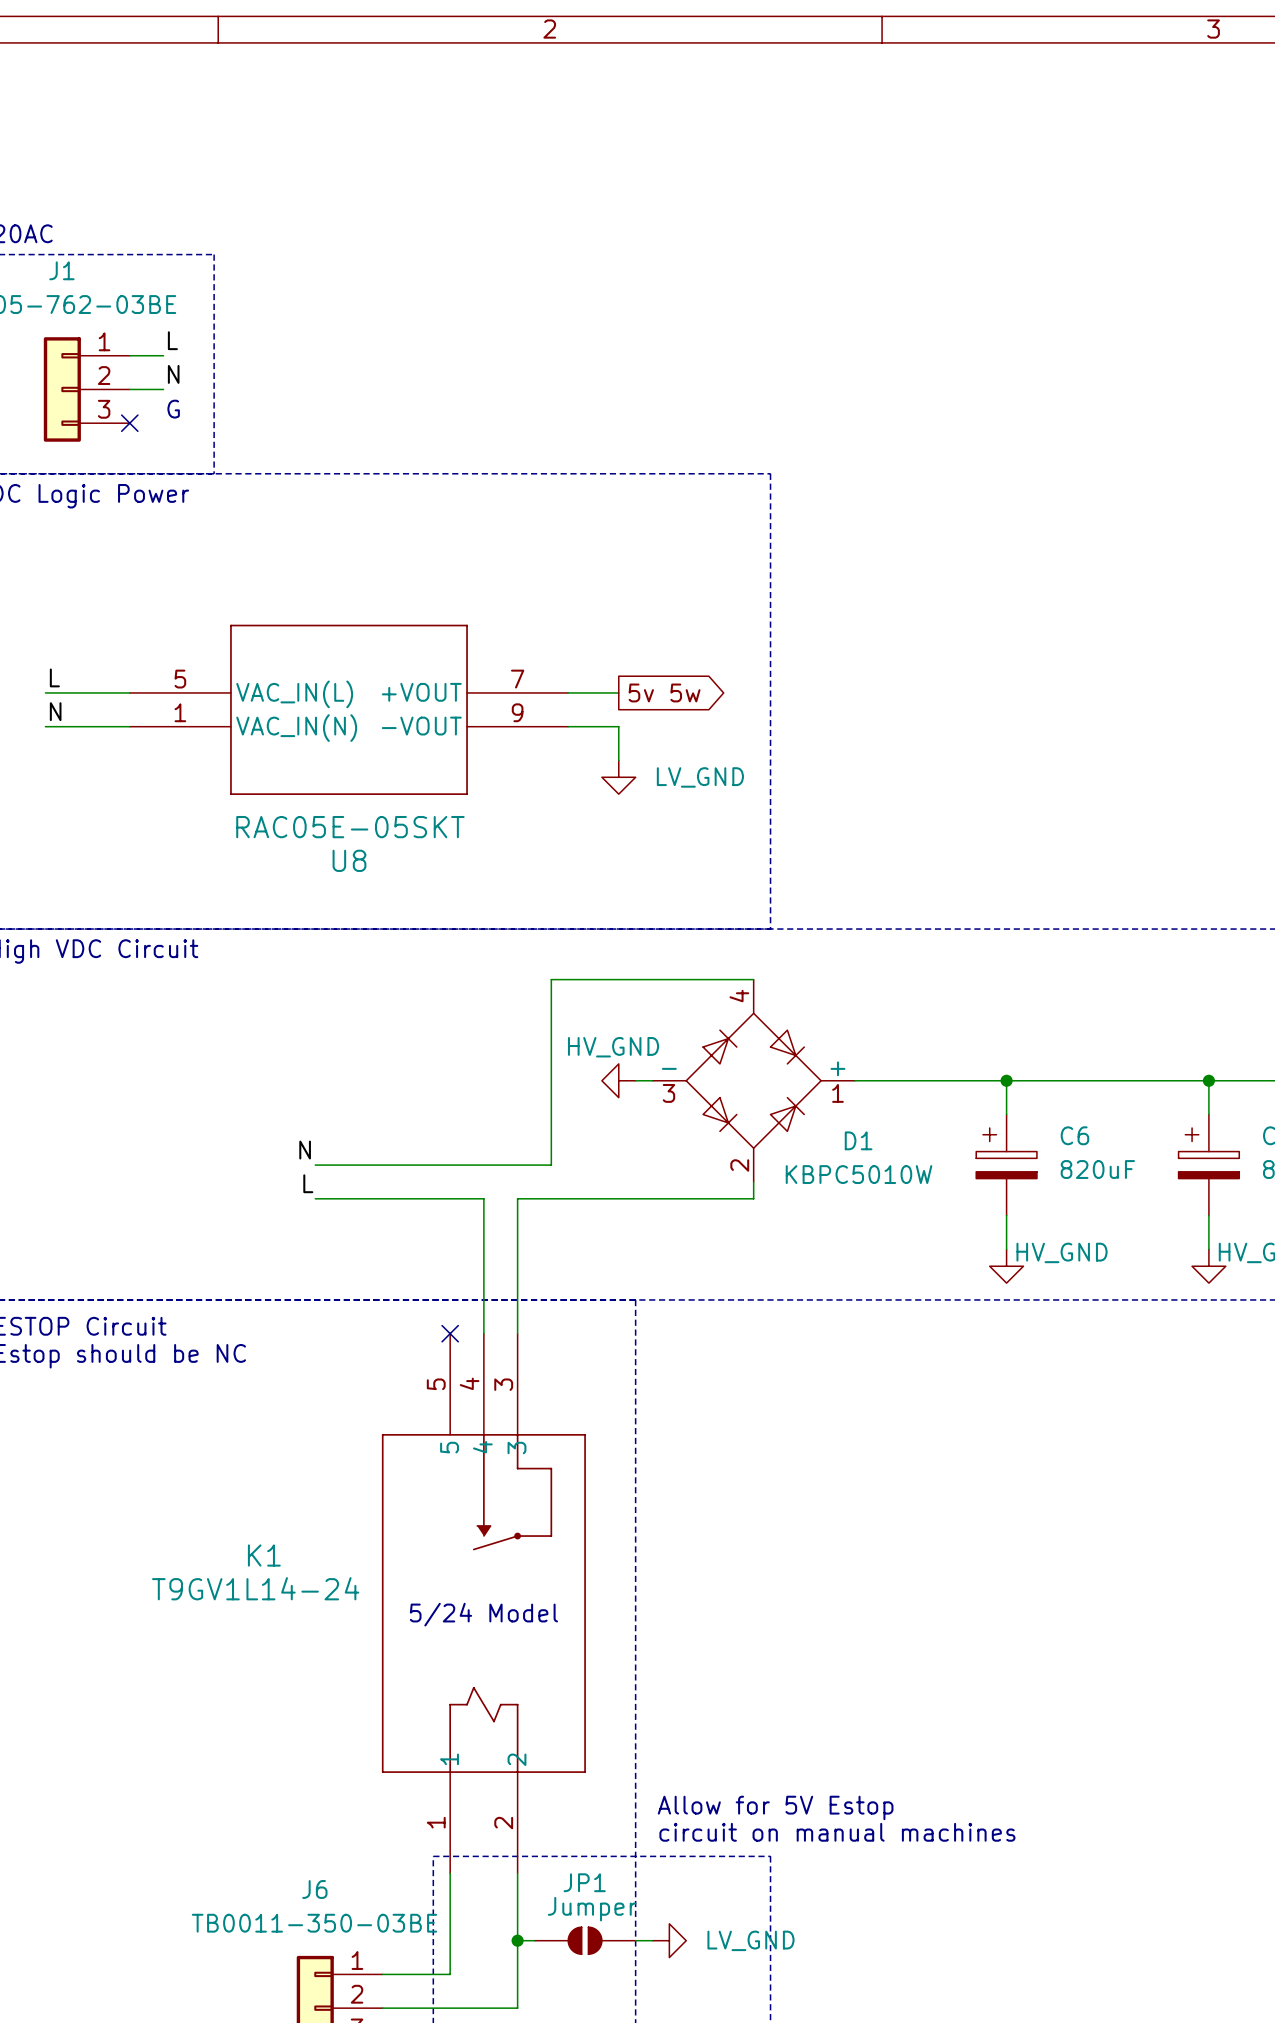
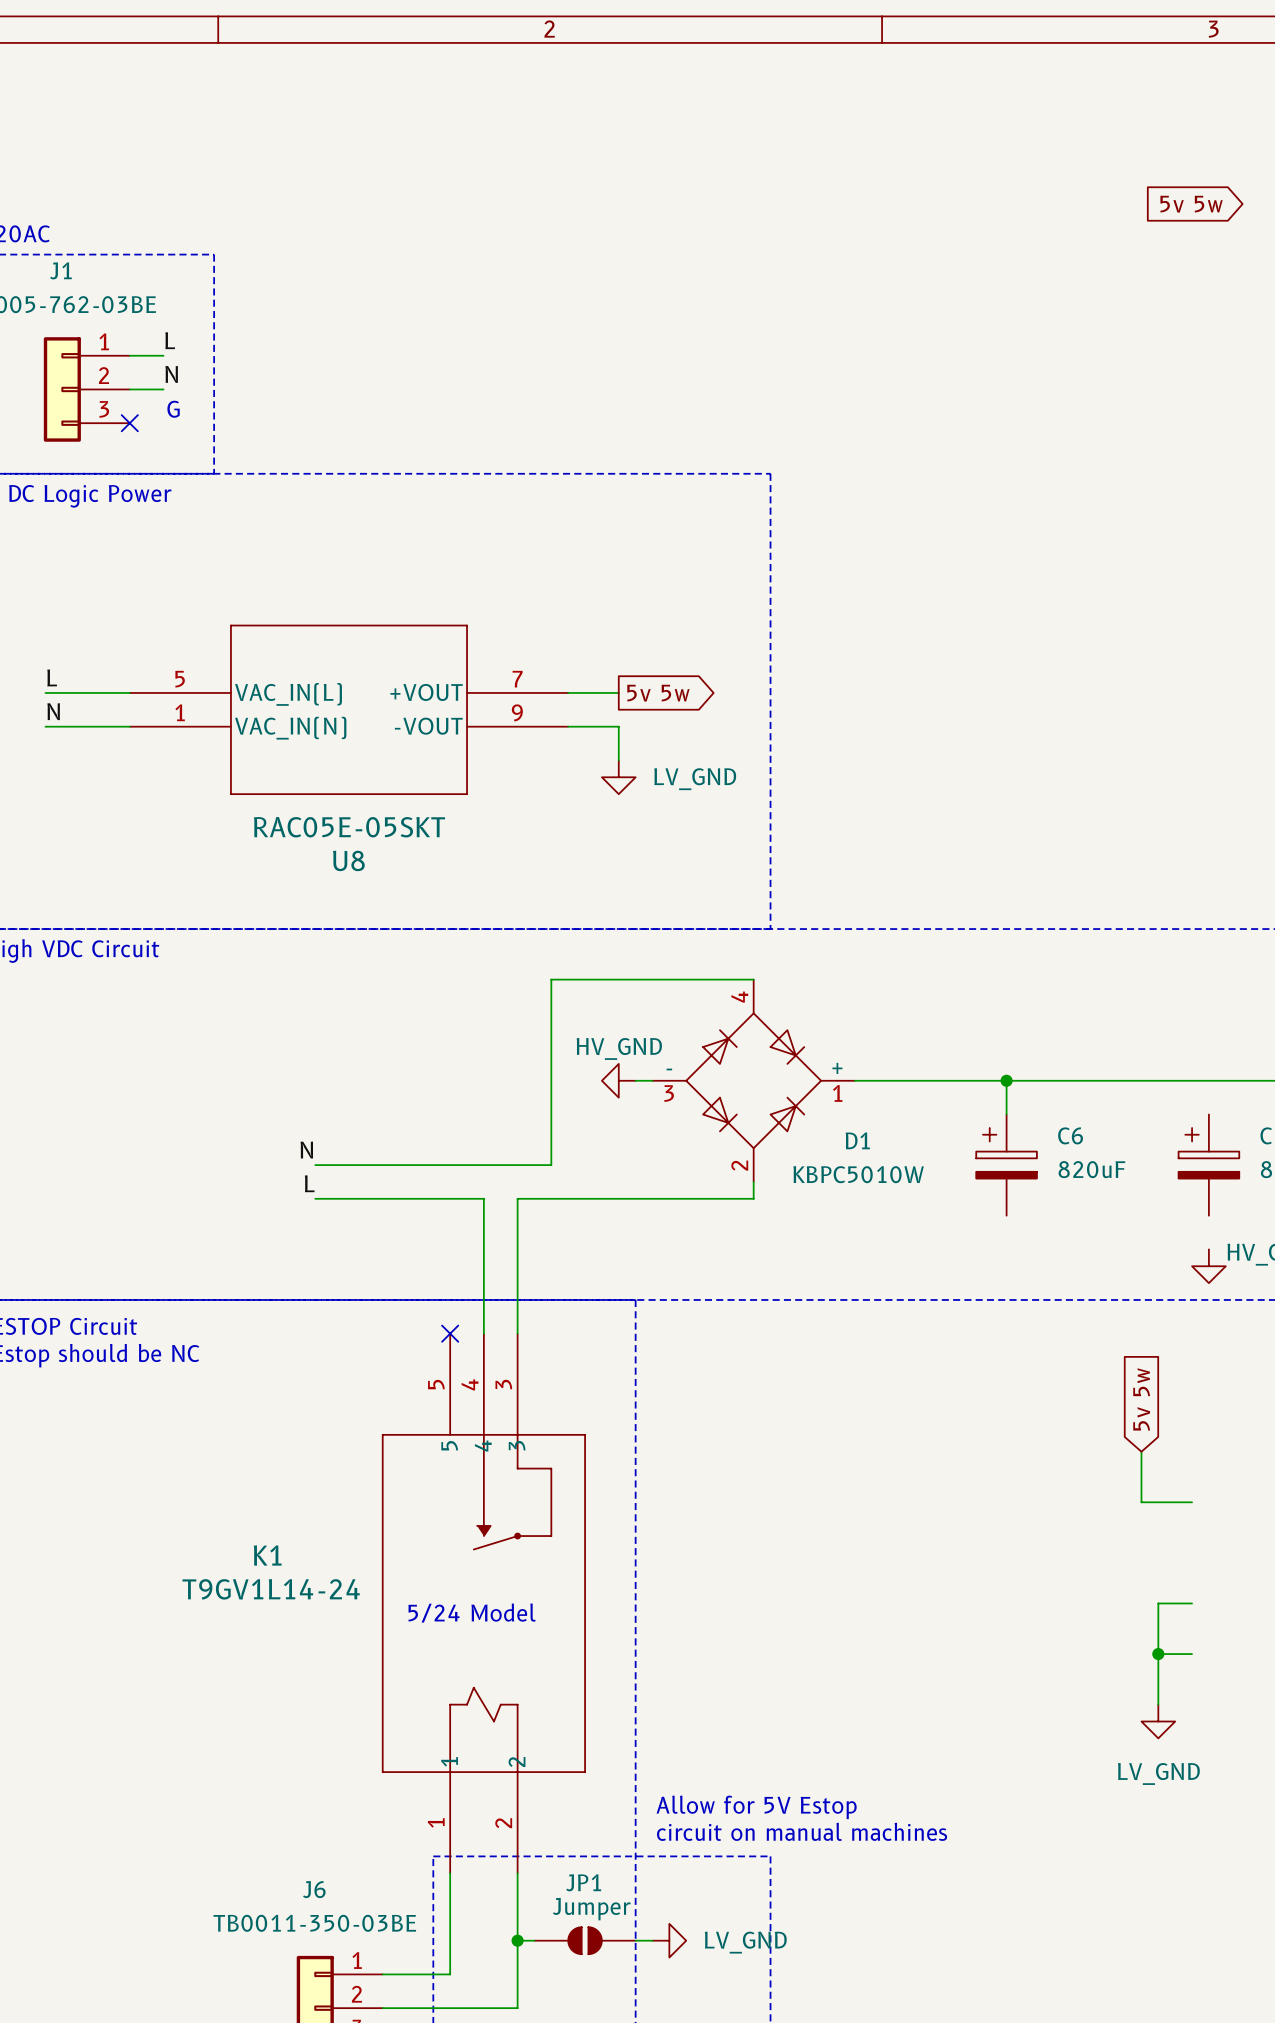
global label: none -> 5v 5w (1191, 204)
wire: (1208, 1080) (1208, 1114) -> none
junction: (1208, 1080) -> none
wire: (1006, 1215) (1006, 1249) -> none
wire: (1208, 1215) (1208, 1249) -> none
power symbol: HV_GND (1006, 1266) -> none
global label: none -> 5v 5w (1141, 1399)
wire: none -> (1141, 1451) (1141, 1502) (1192, 1502)
wire: none -> (1192, 1603) (1158, 1603) (1158, 1704)
wire: none -> (1158, 1654) (1192, 1654)
junction: none -> (1158, 1654)
power symbol: none -> LV_GND (1158, 1721)

